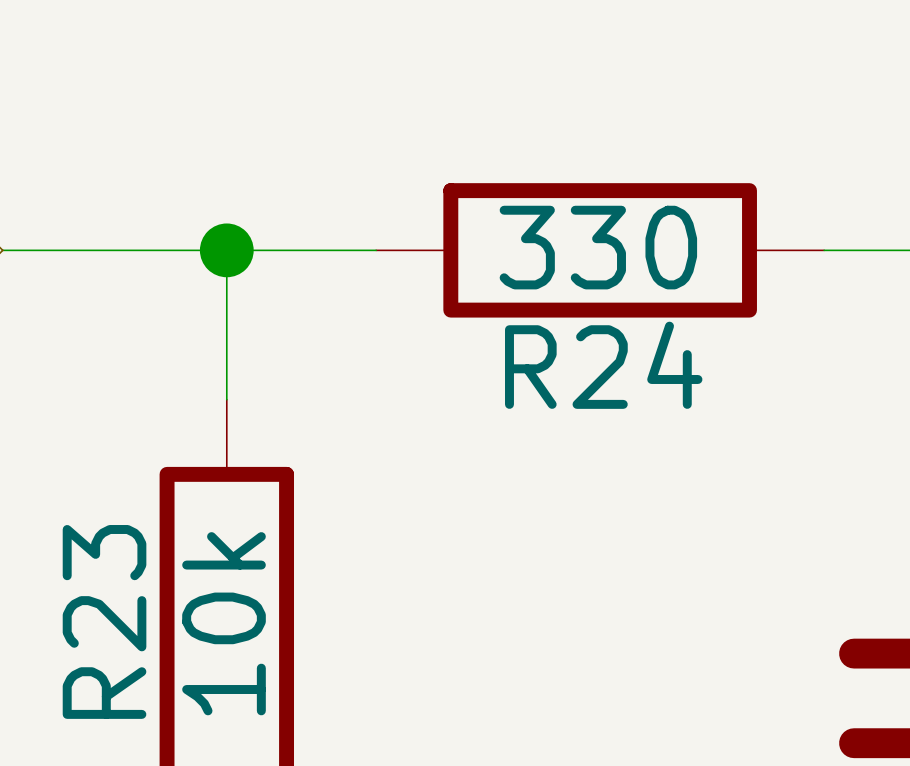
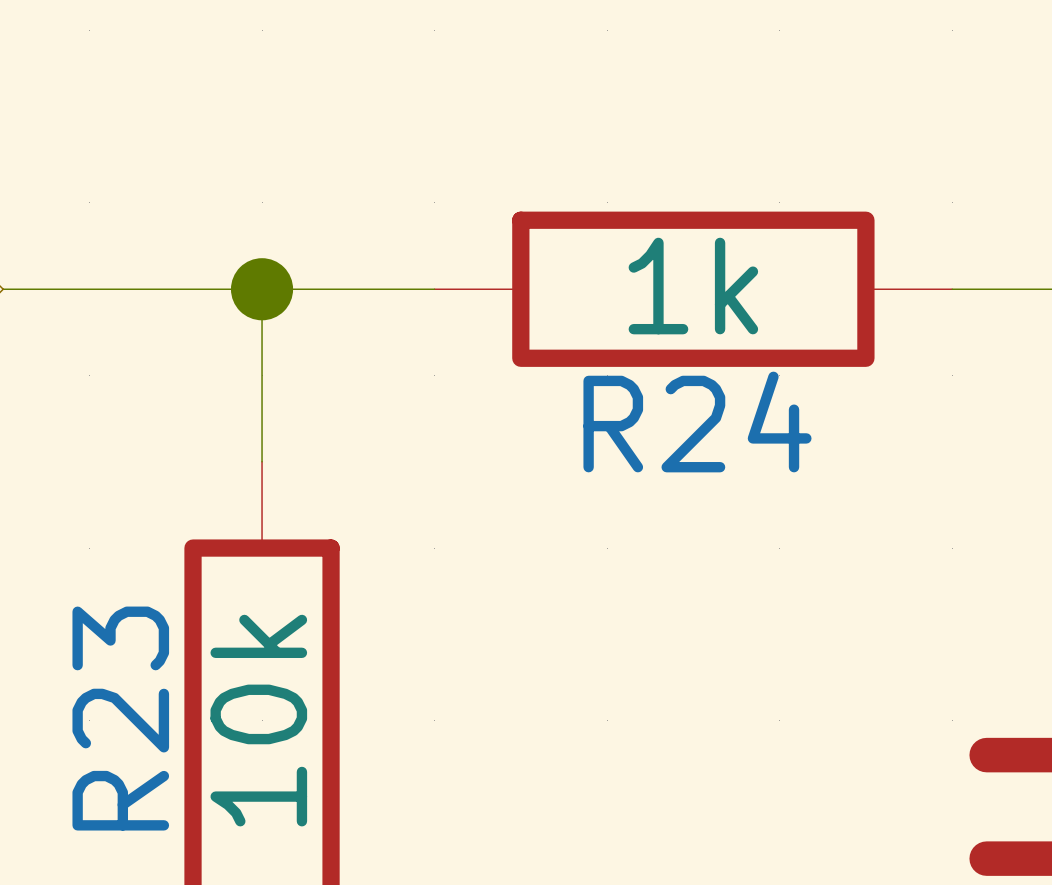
R24 value: 330 (598, 247) -> 1k (693, 286)

